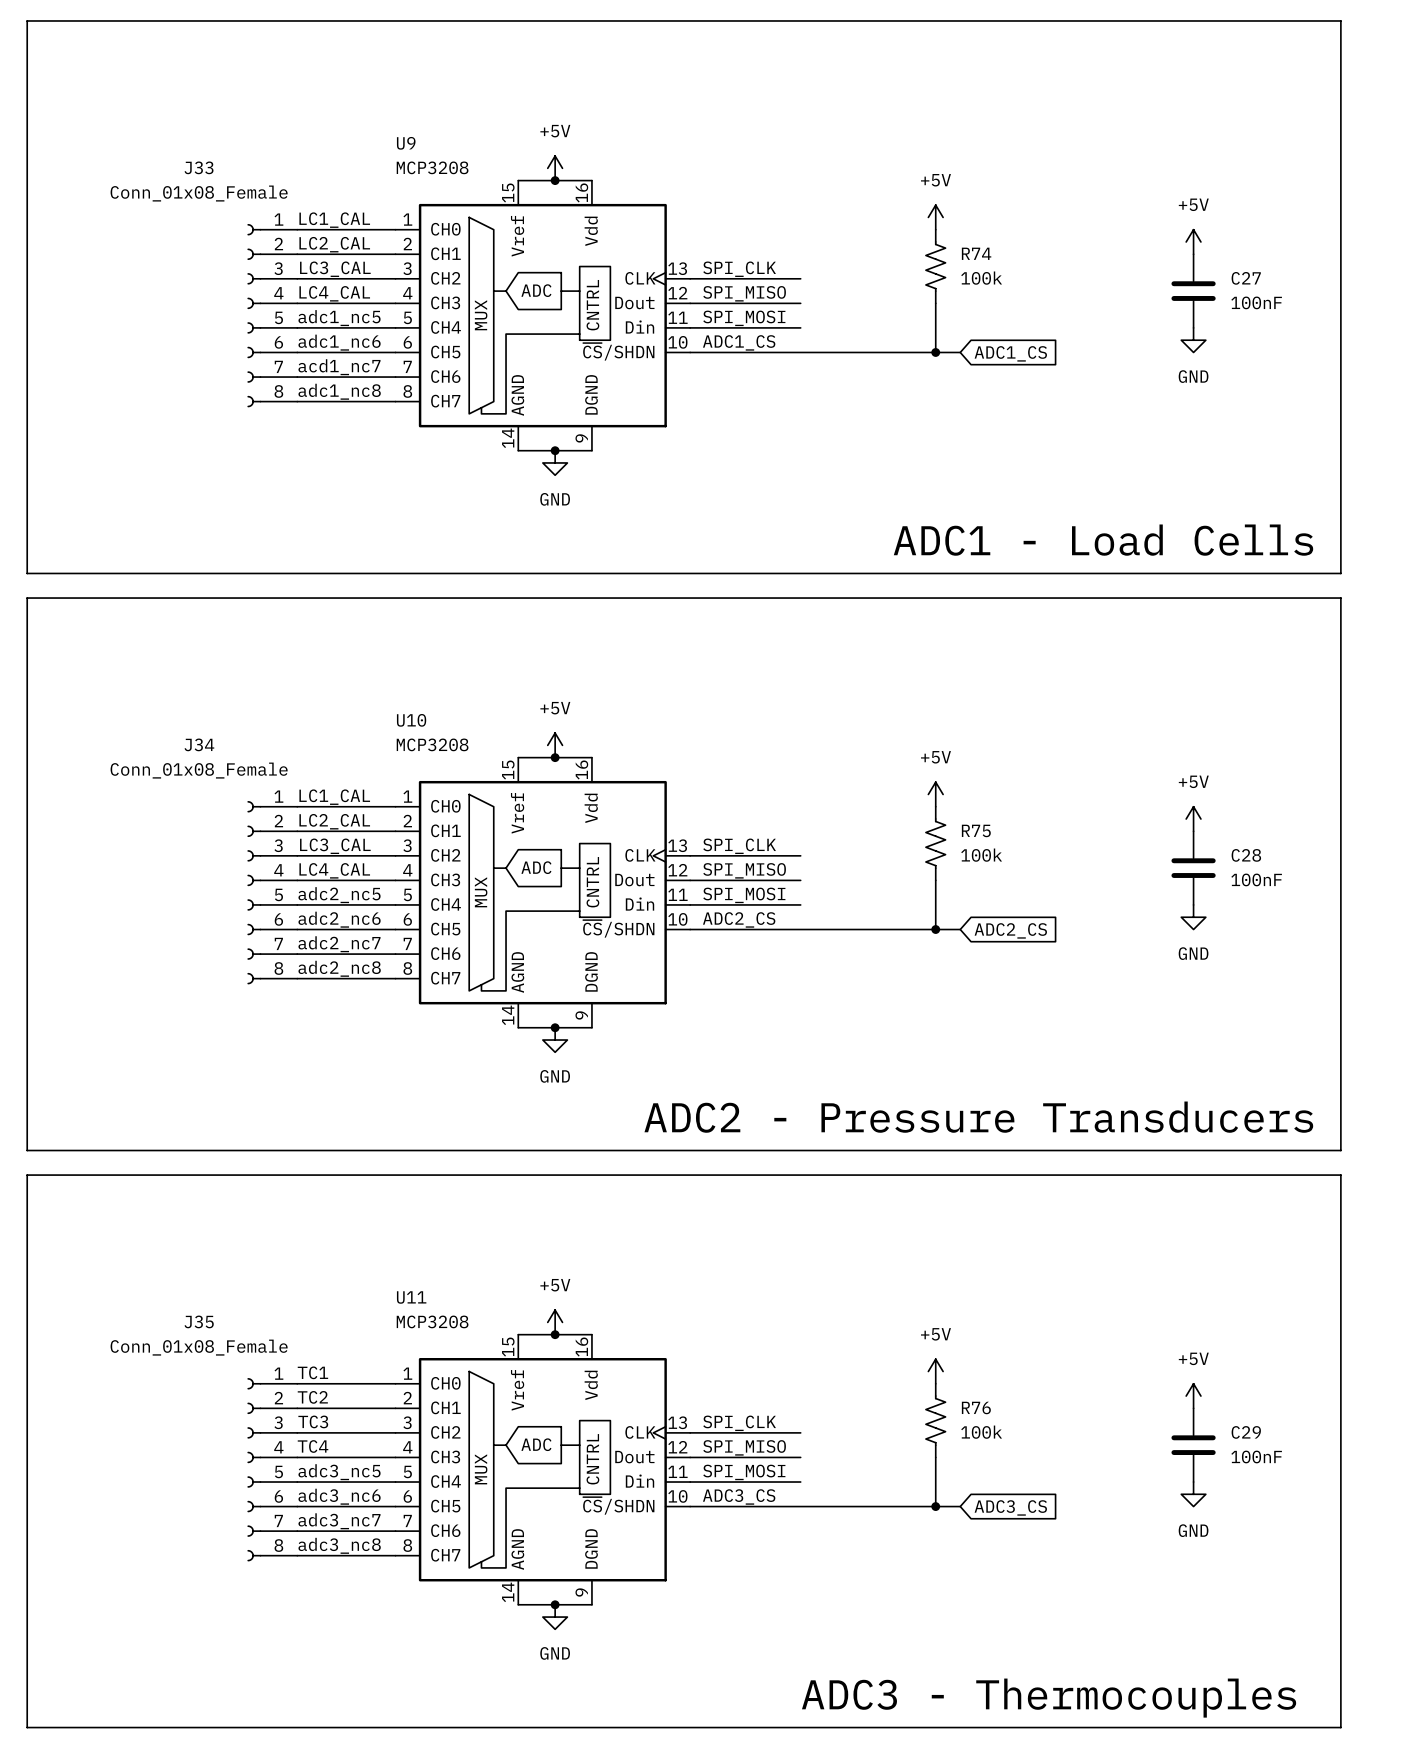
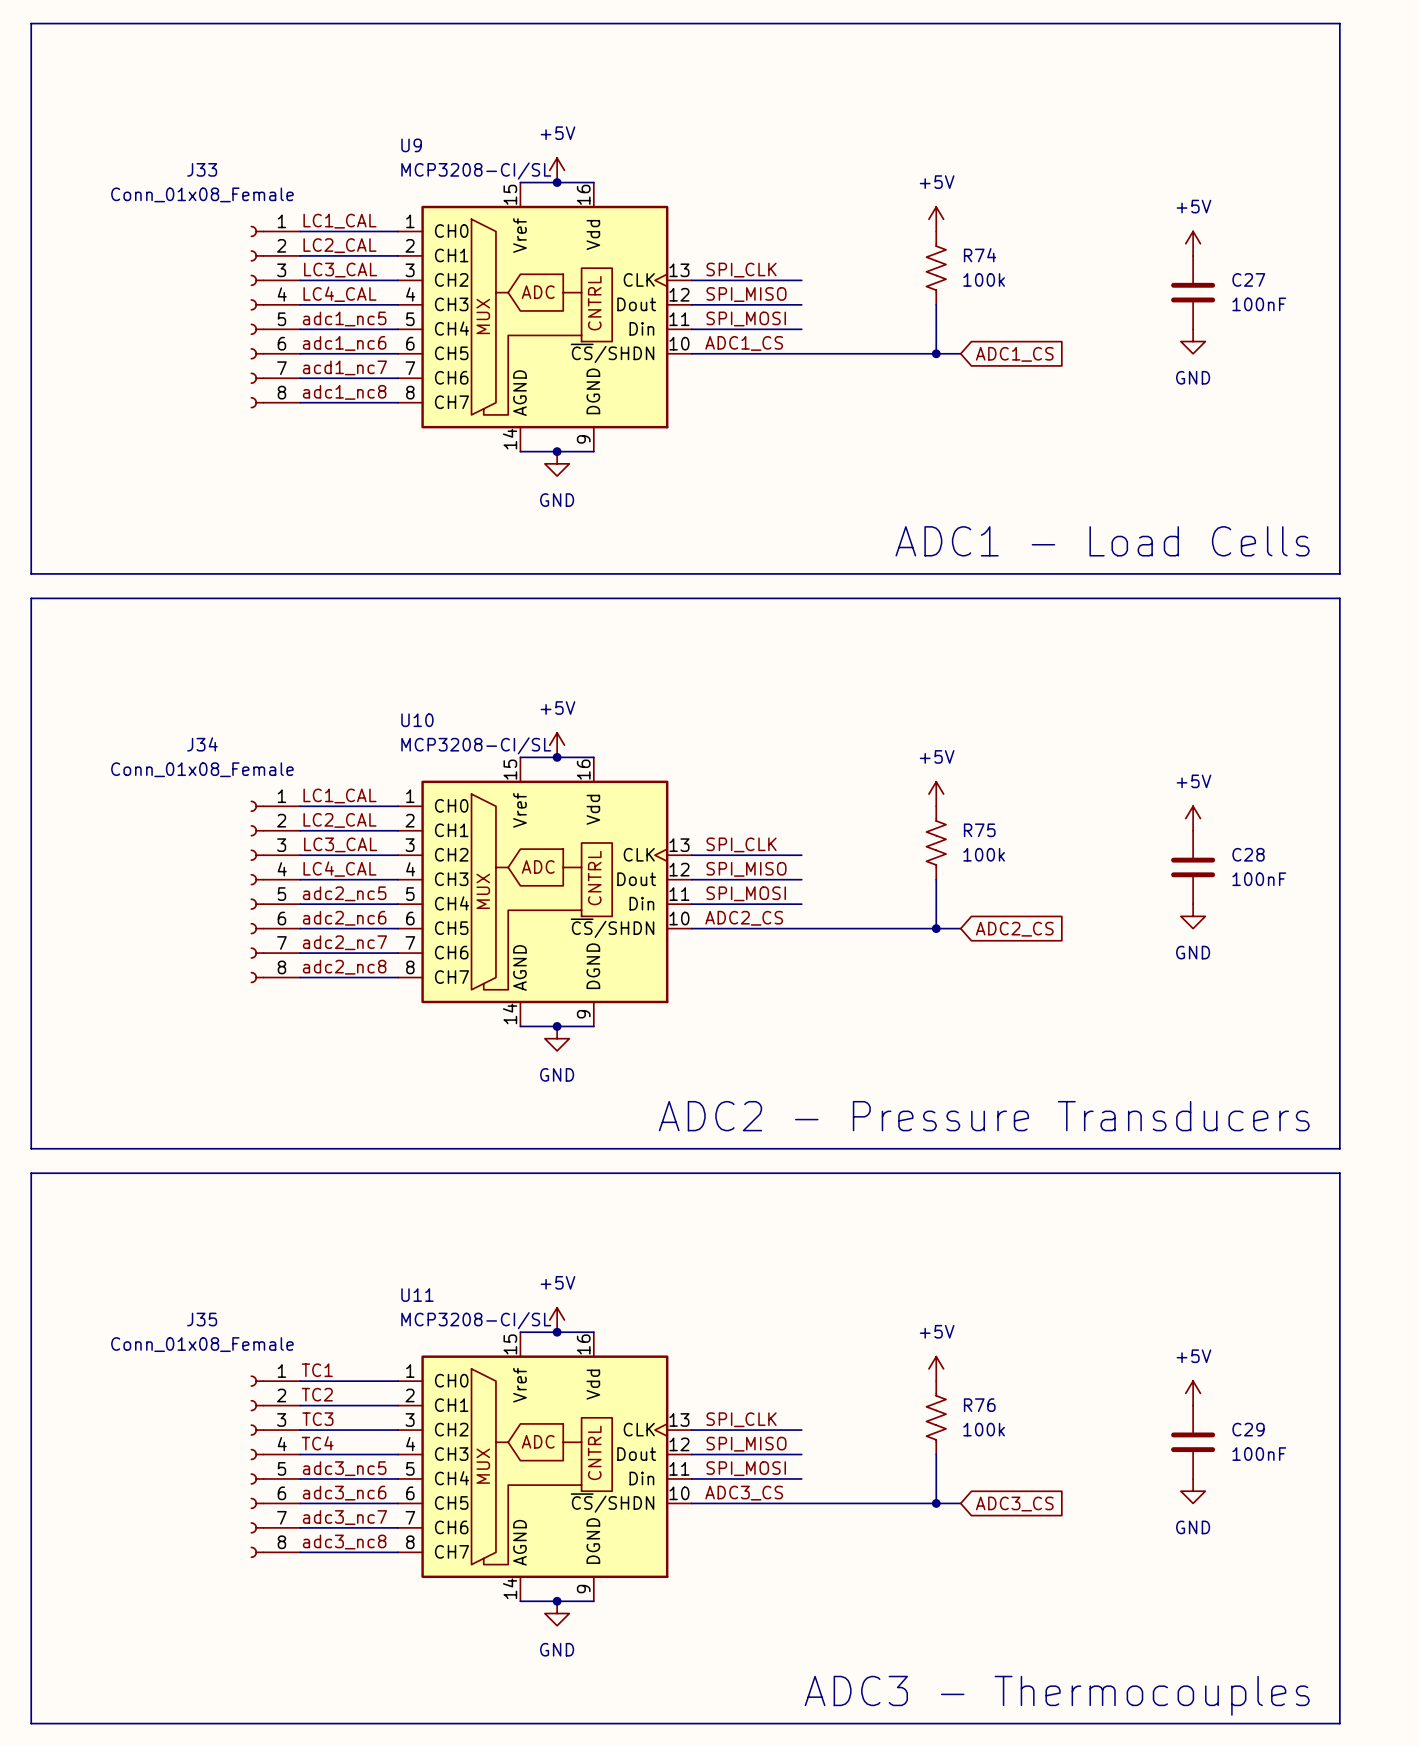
U9 value: MCP3208 (432, 167) -> MCP3208-CI/SL (476, 171)
U10 value: MCP3208 (432, 744) -> MCP3208-CI/SL (476, 745)
U11 value: MCP3208 (432, 1321) -> MCP3208-CI/SL (476, 1320)

